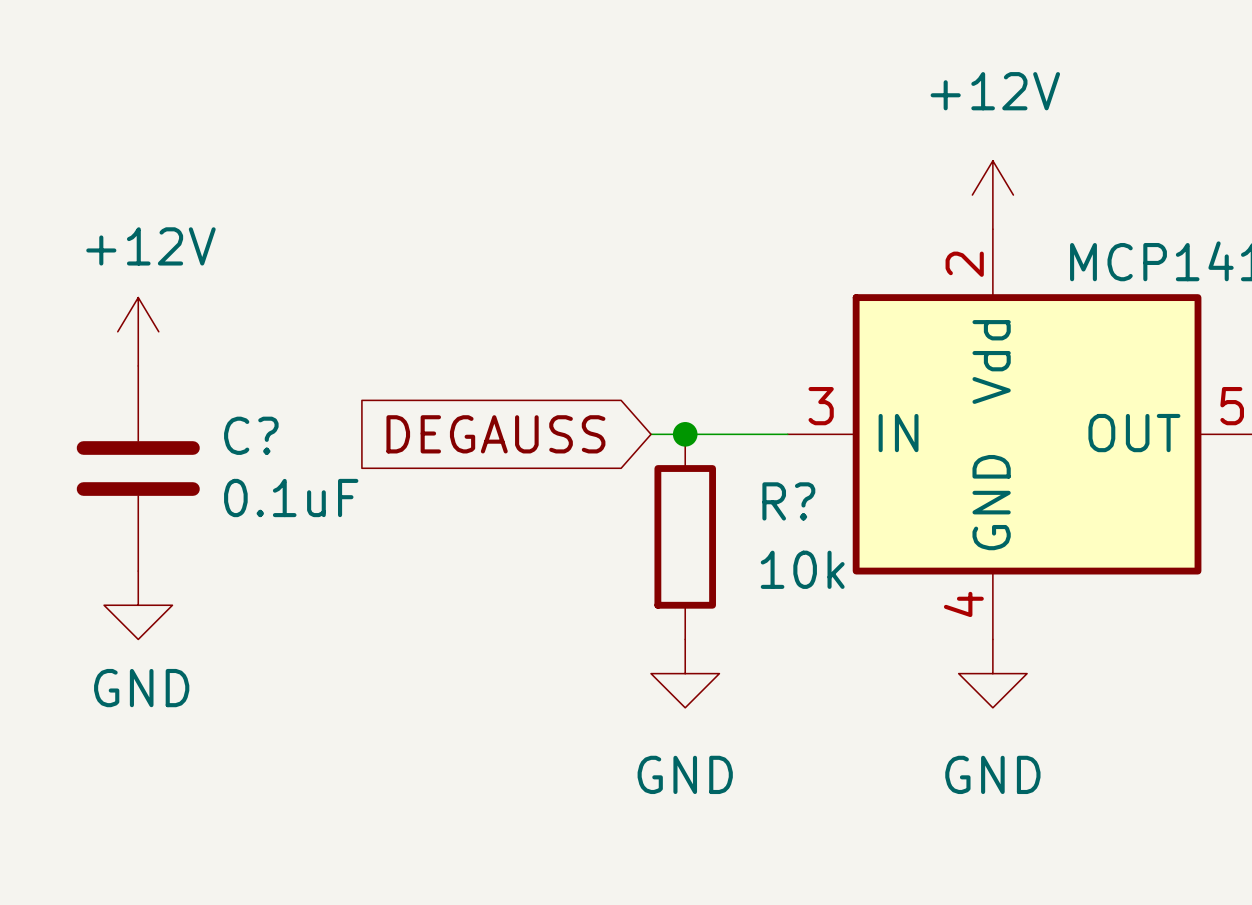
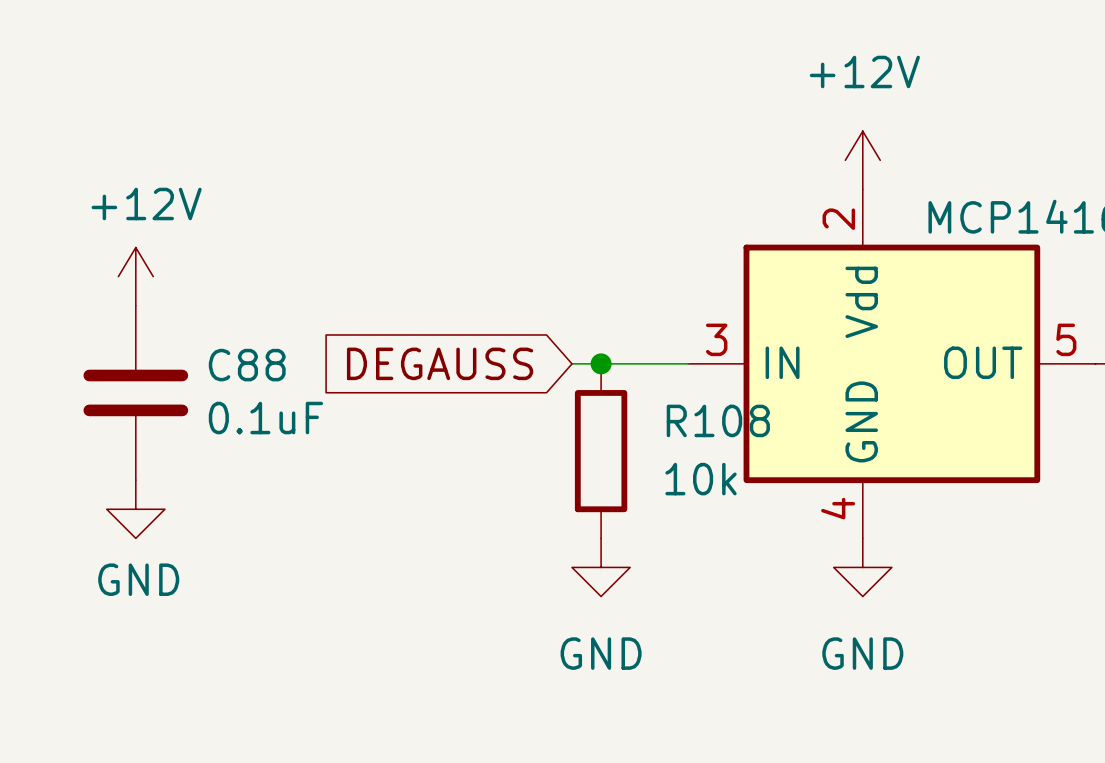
C? name: C? (251, 435) -> C88 (247, 365)
R? name: R? (788, 501) -> R108 (718, 420)

